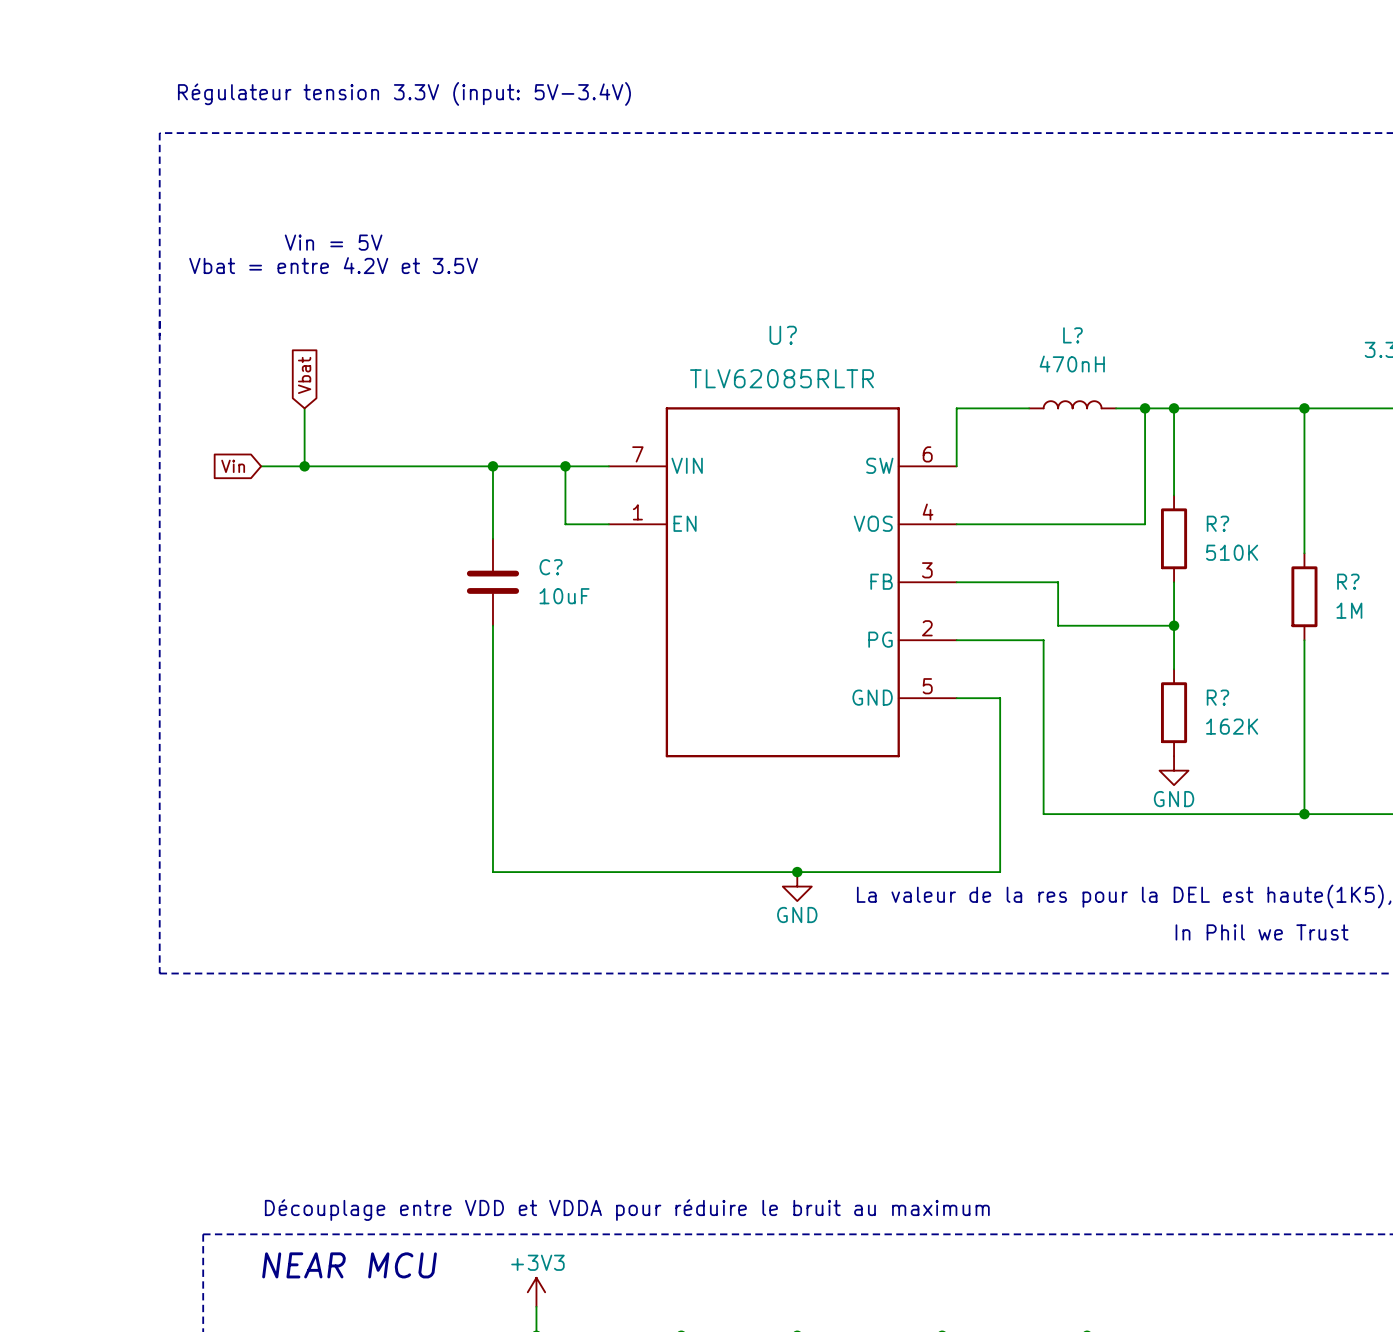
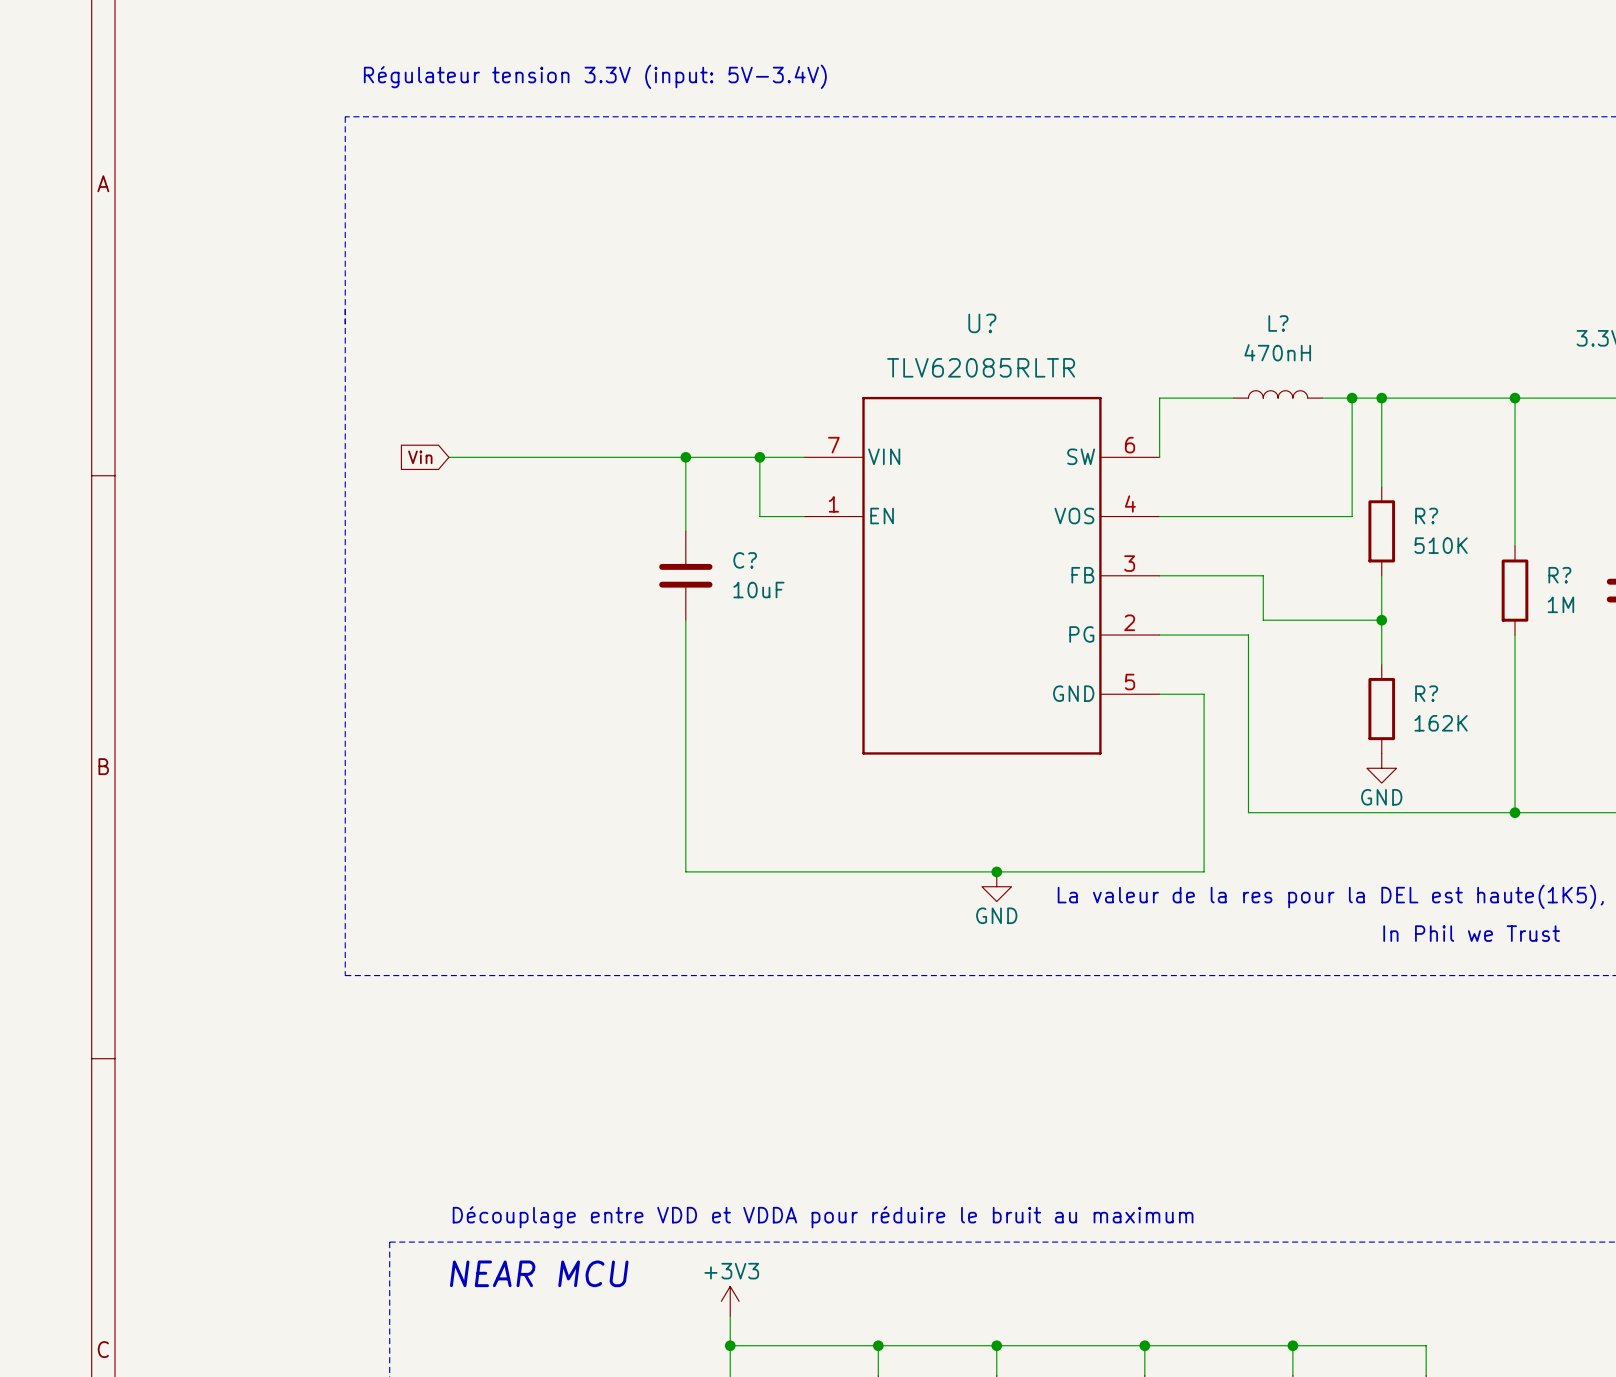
text: Vin = 5V (333, 242) -> none
text: Vbat = entre 4.2V et 3.5V (333, 265) -> none
global label: Vbat (304, 375) -> none
wire: (304, 408) (304, 466) -> none
junction: (304, 466) -> none

